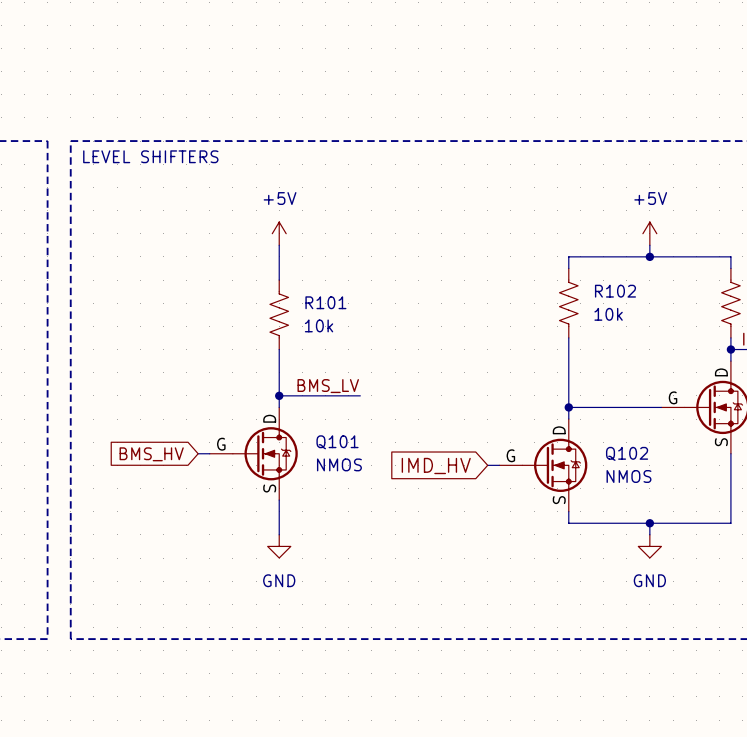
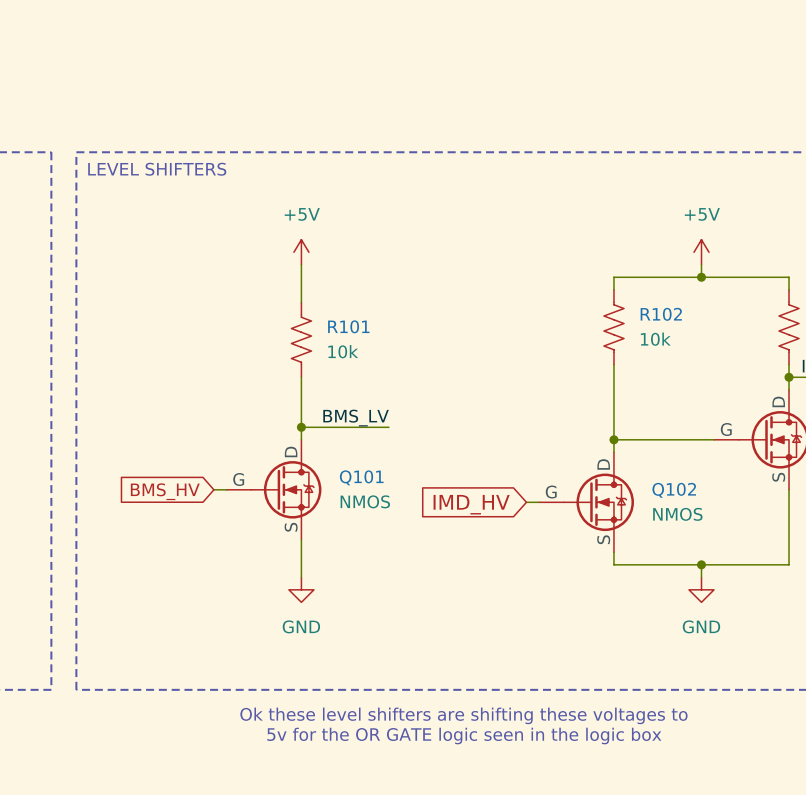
text: none -> Ok these level shifters are shifting these voltages to (463, 715)
text: none -> 5v for the OR GATE logic seen in the logic box (464, 736)

